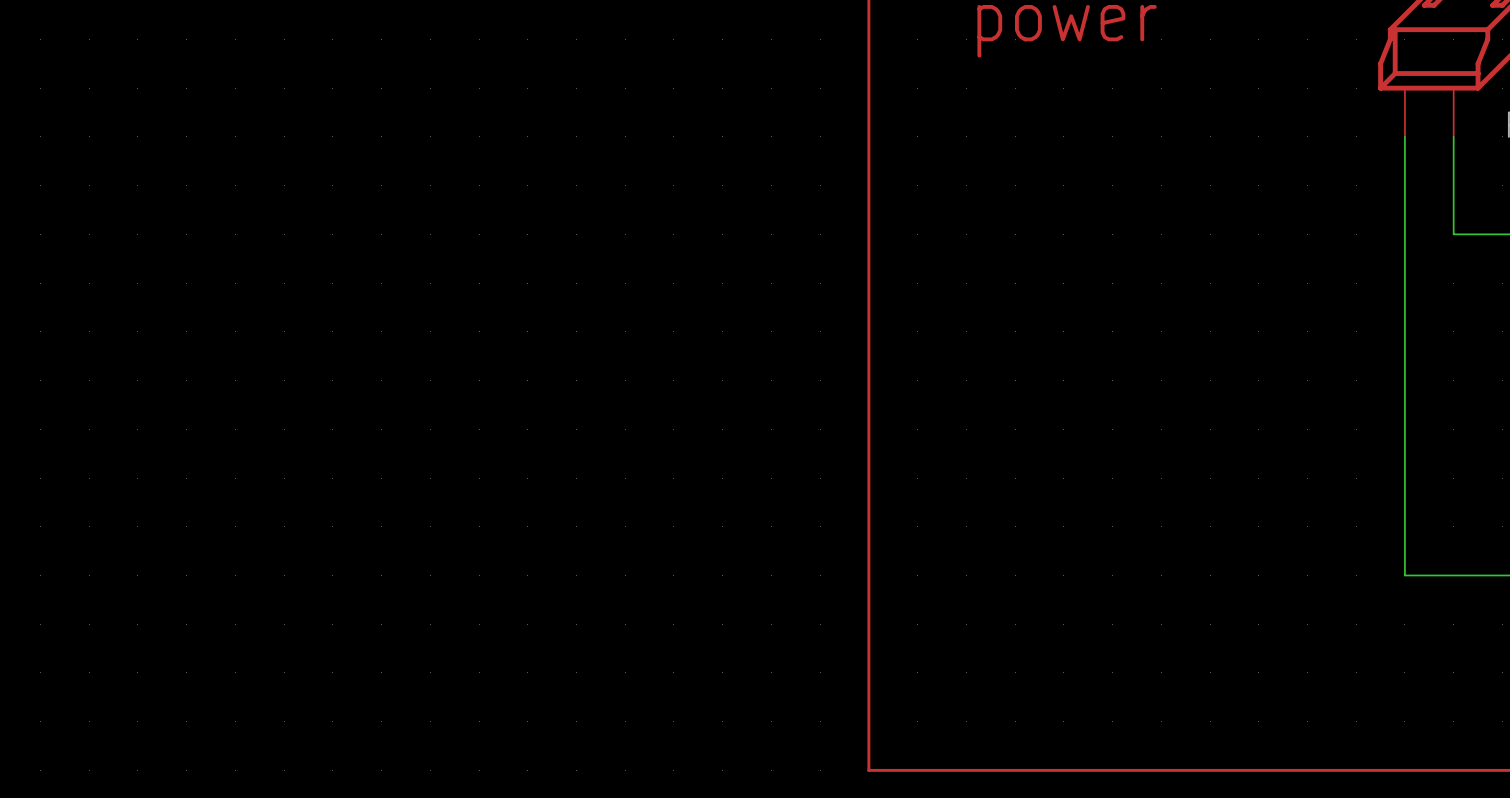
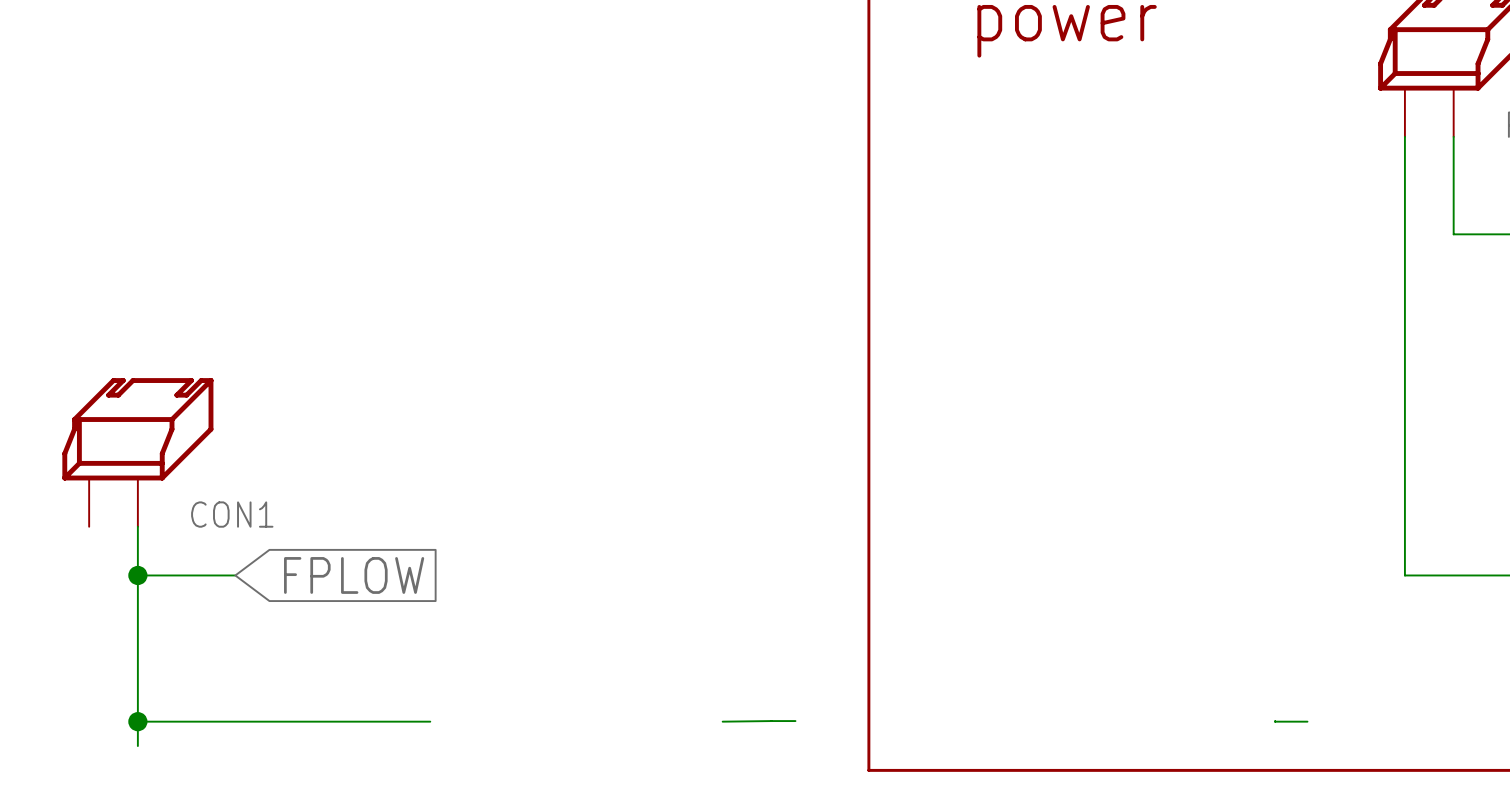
CON1: none -> (137, 452)
wire: none -> (137, 526) (137, 746)
wire: none -> (137, 575) (235, 575)
junction: none -> (137, 575)
global label: none -> FPLOW (354, 575)
wire: none -> (137, 721) (430, 721)
junction: none -> (137, 721)
wire: none -> (795, 721) (722, 721)
wire: none -> (1275, 721) (1307, 721)

